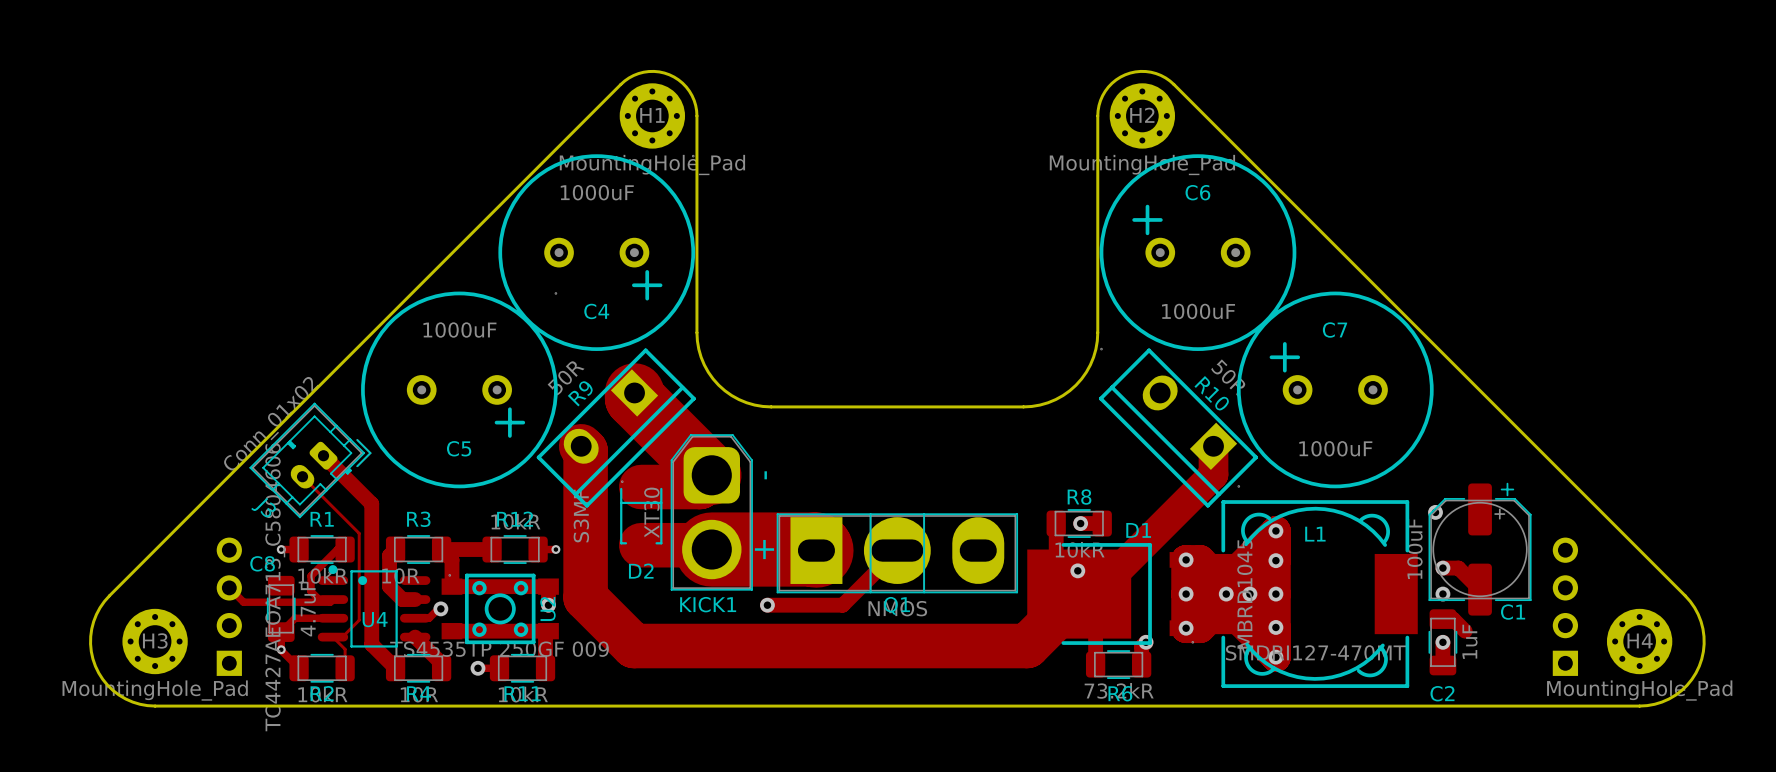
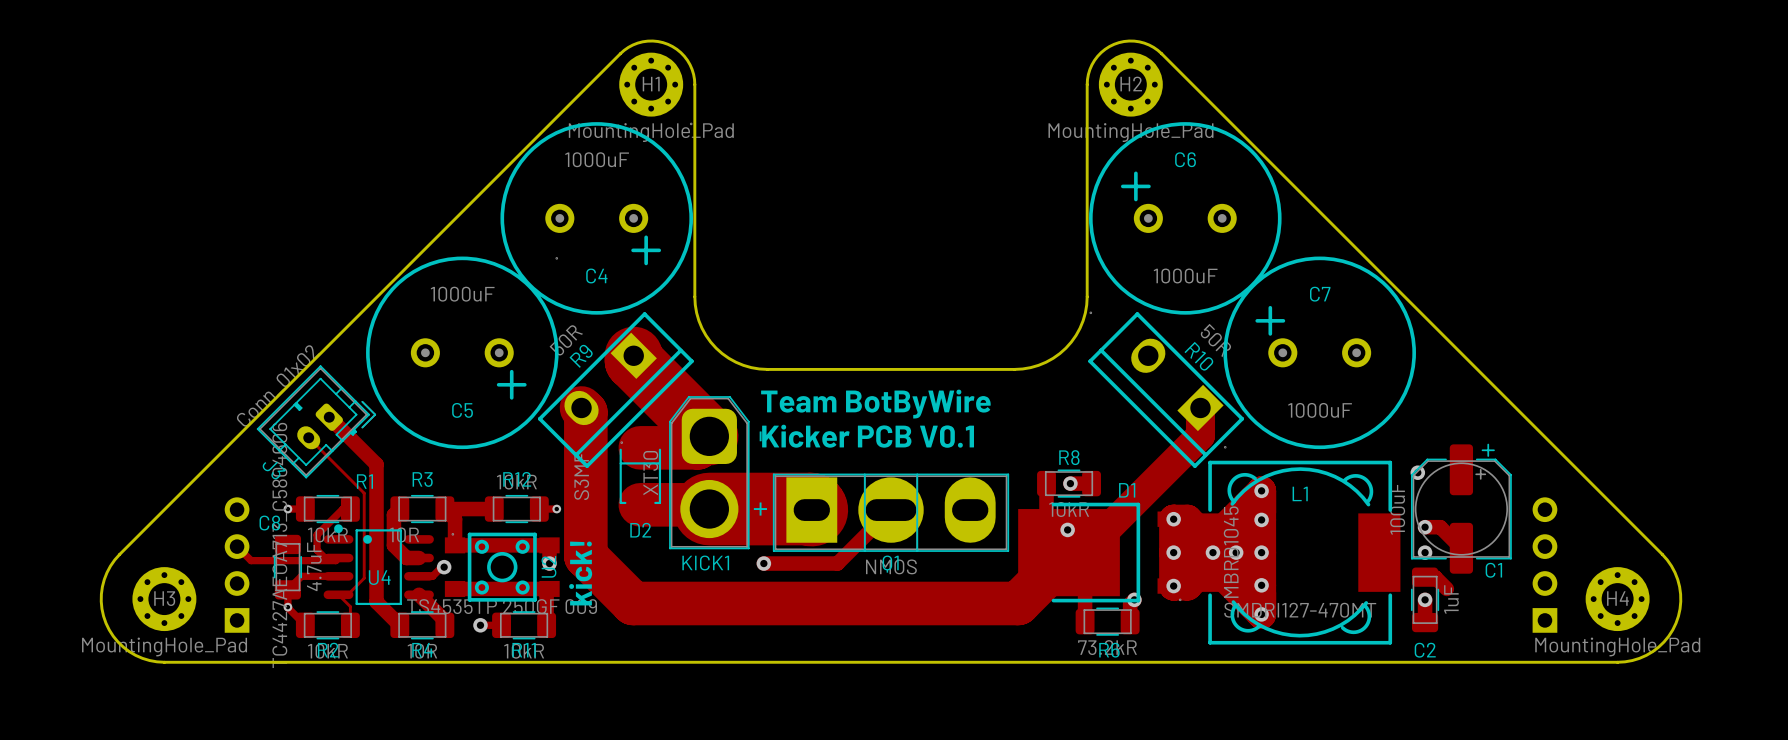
text: none -> Team BotByWire (875, 404)
text: none -> Kicker PCB V0.1 (868, 436)
R1 name position: R1 (322, 519) -> R1 (364, 481)
text: none -> kick! (580, 573)

